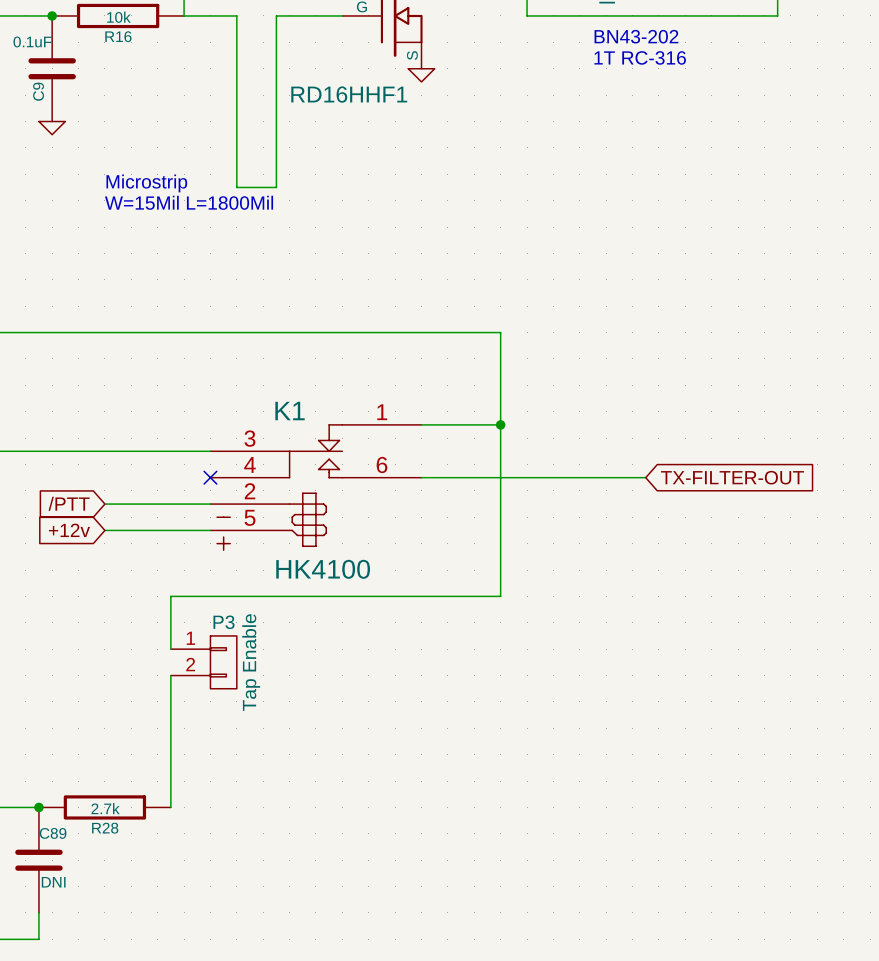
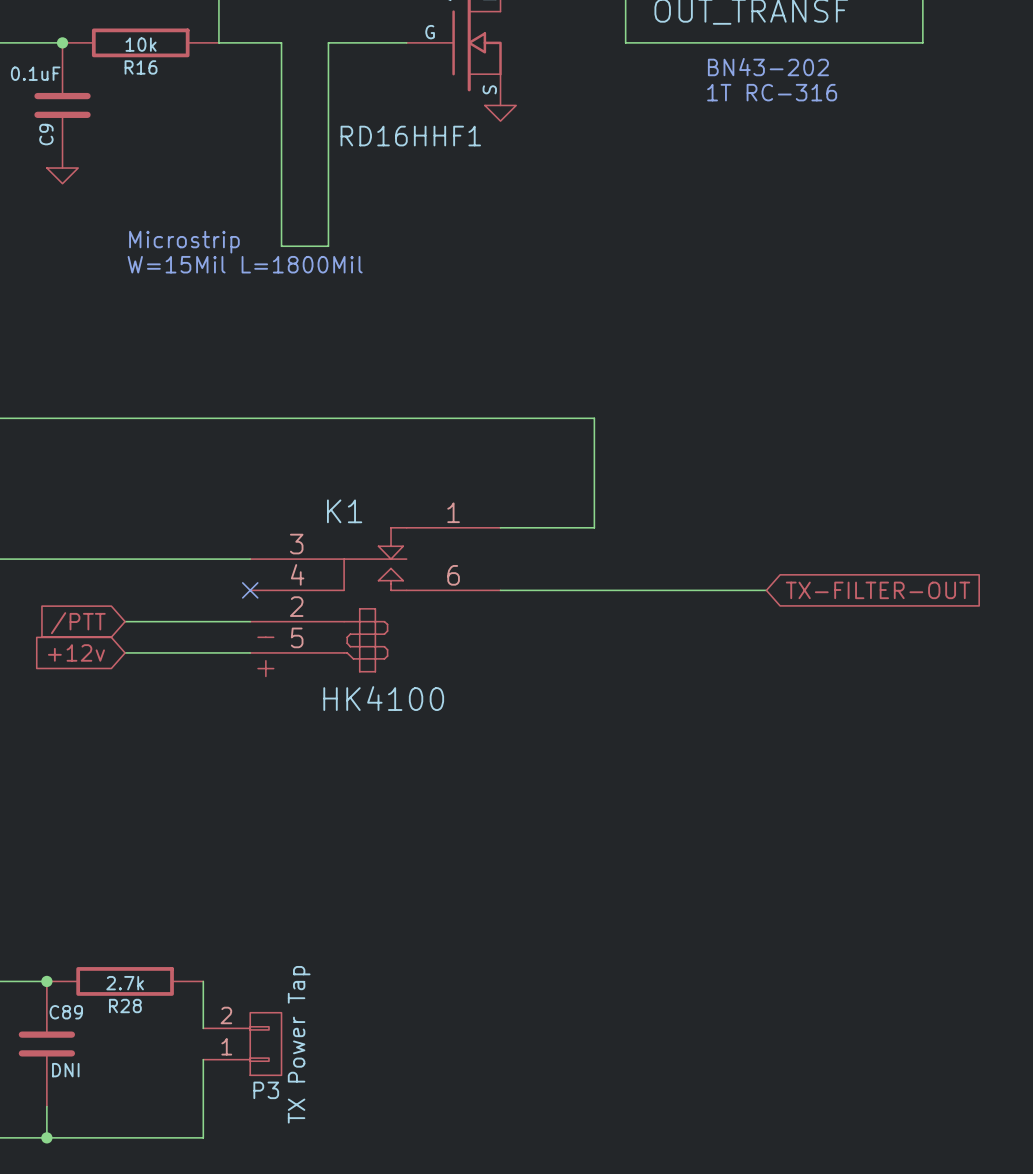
wire: (500, 424) (500, 596) (170, 596) (170, 649) -> none
junction: (500, 424) -> none
P3 position: (203, 662) -> (242, 1044)
P3 flip: as is (223, 662) -> up-down (265, 1044)
P3 value: Tap Enable (251, 662) -> TX Power Tap (299, 1044)
wire: (170, 675) (170, 807) -> (203, 1028) (203, 981)
wire: none -> (203, 1059) (203, 1137) (46, 1137)
junction: none -> (46, 1137)

